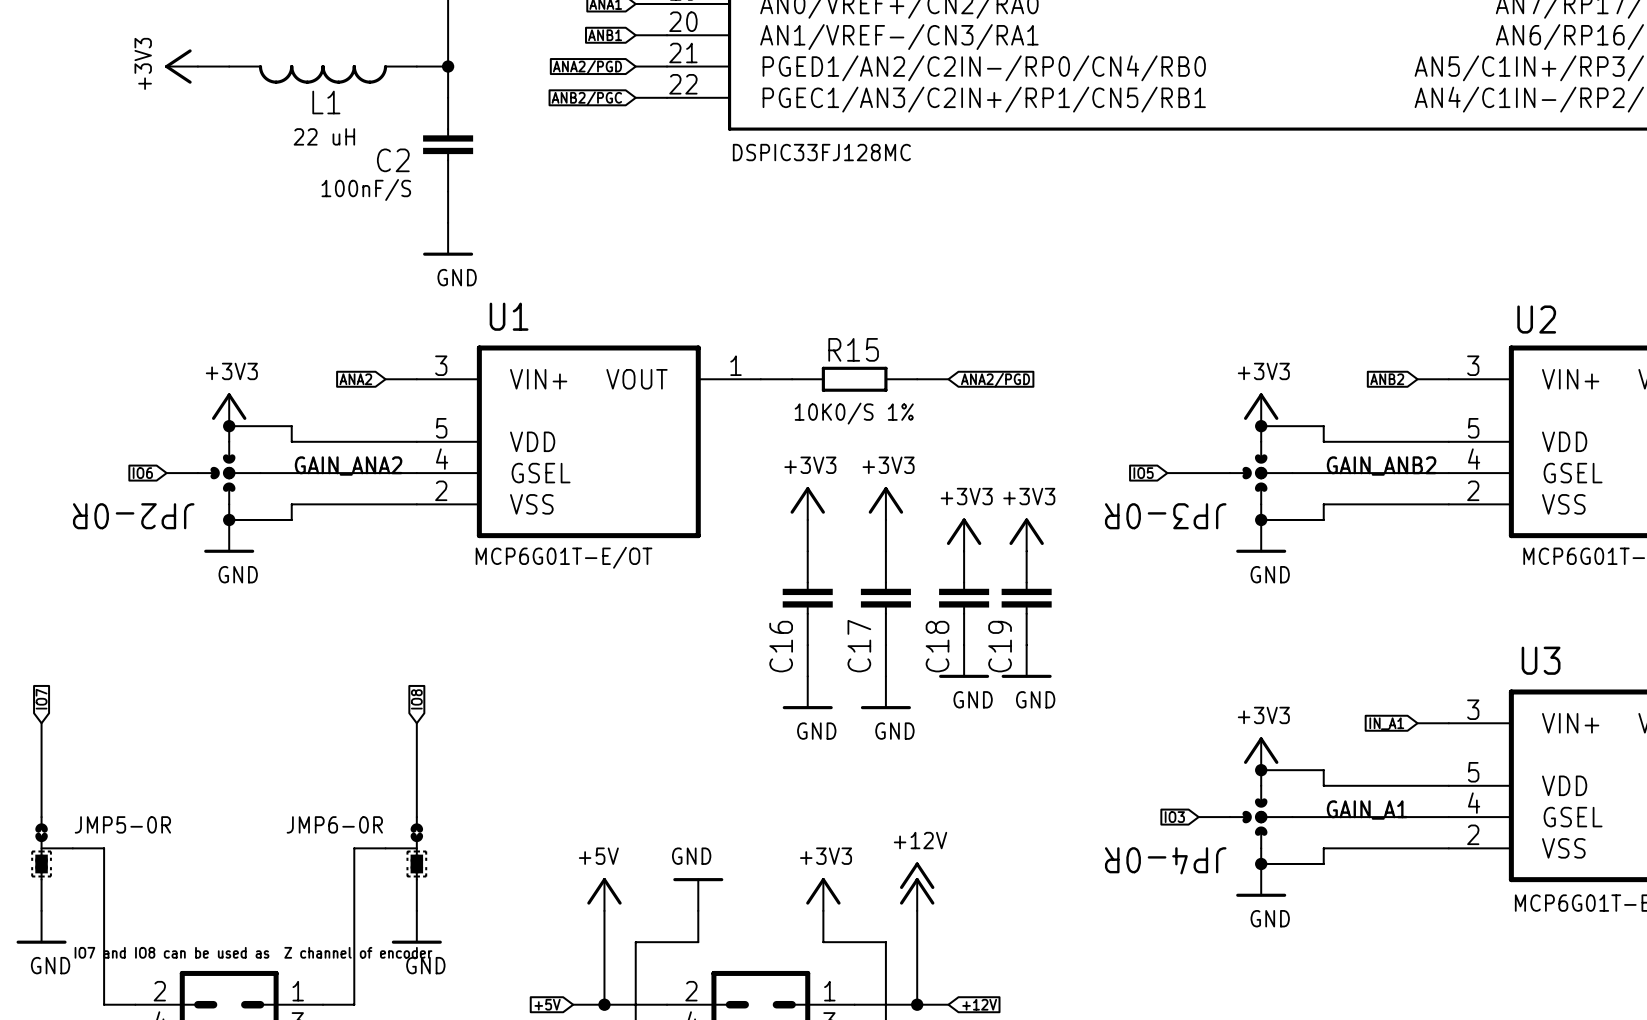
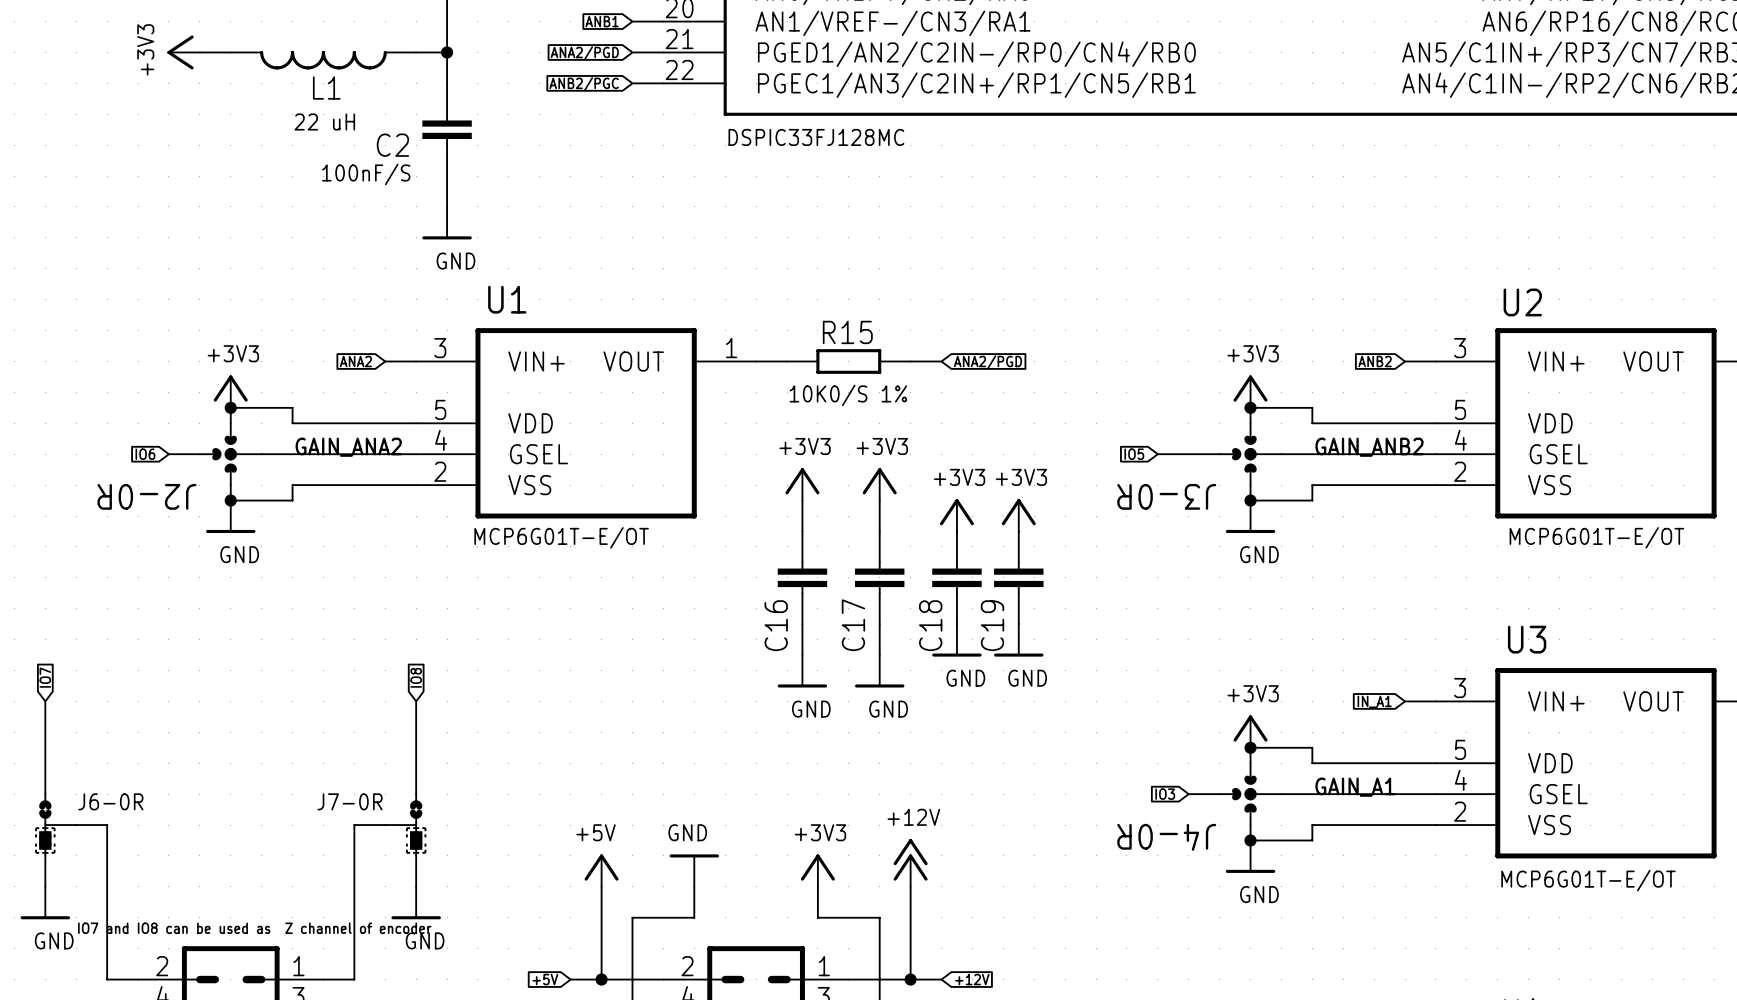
JP2-0R name: JP2-0R (133, 516) -> J2-0R (146, 496)
JP3-0R name: JP3-0R (1165, 516) -> J3-0R (1166, 496)
JMP5-0R name: JMP5-0R (122, 824) -> J6-0R (110, 801)
JMP6-0R name: JMP6-0R (334, 824) -> J7-0R (350, 801)
JP4-0R name: JP4-0R (1165, 860) -> J4-0R (1166, 837)

